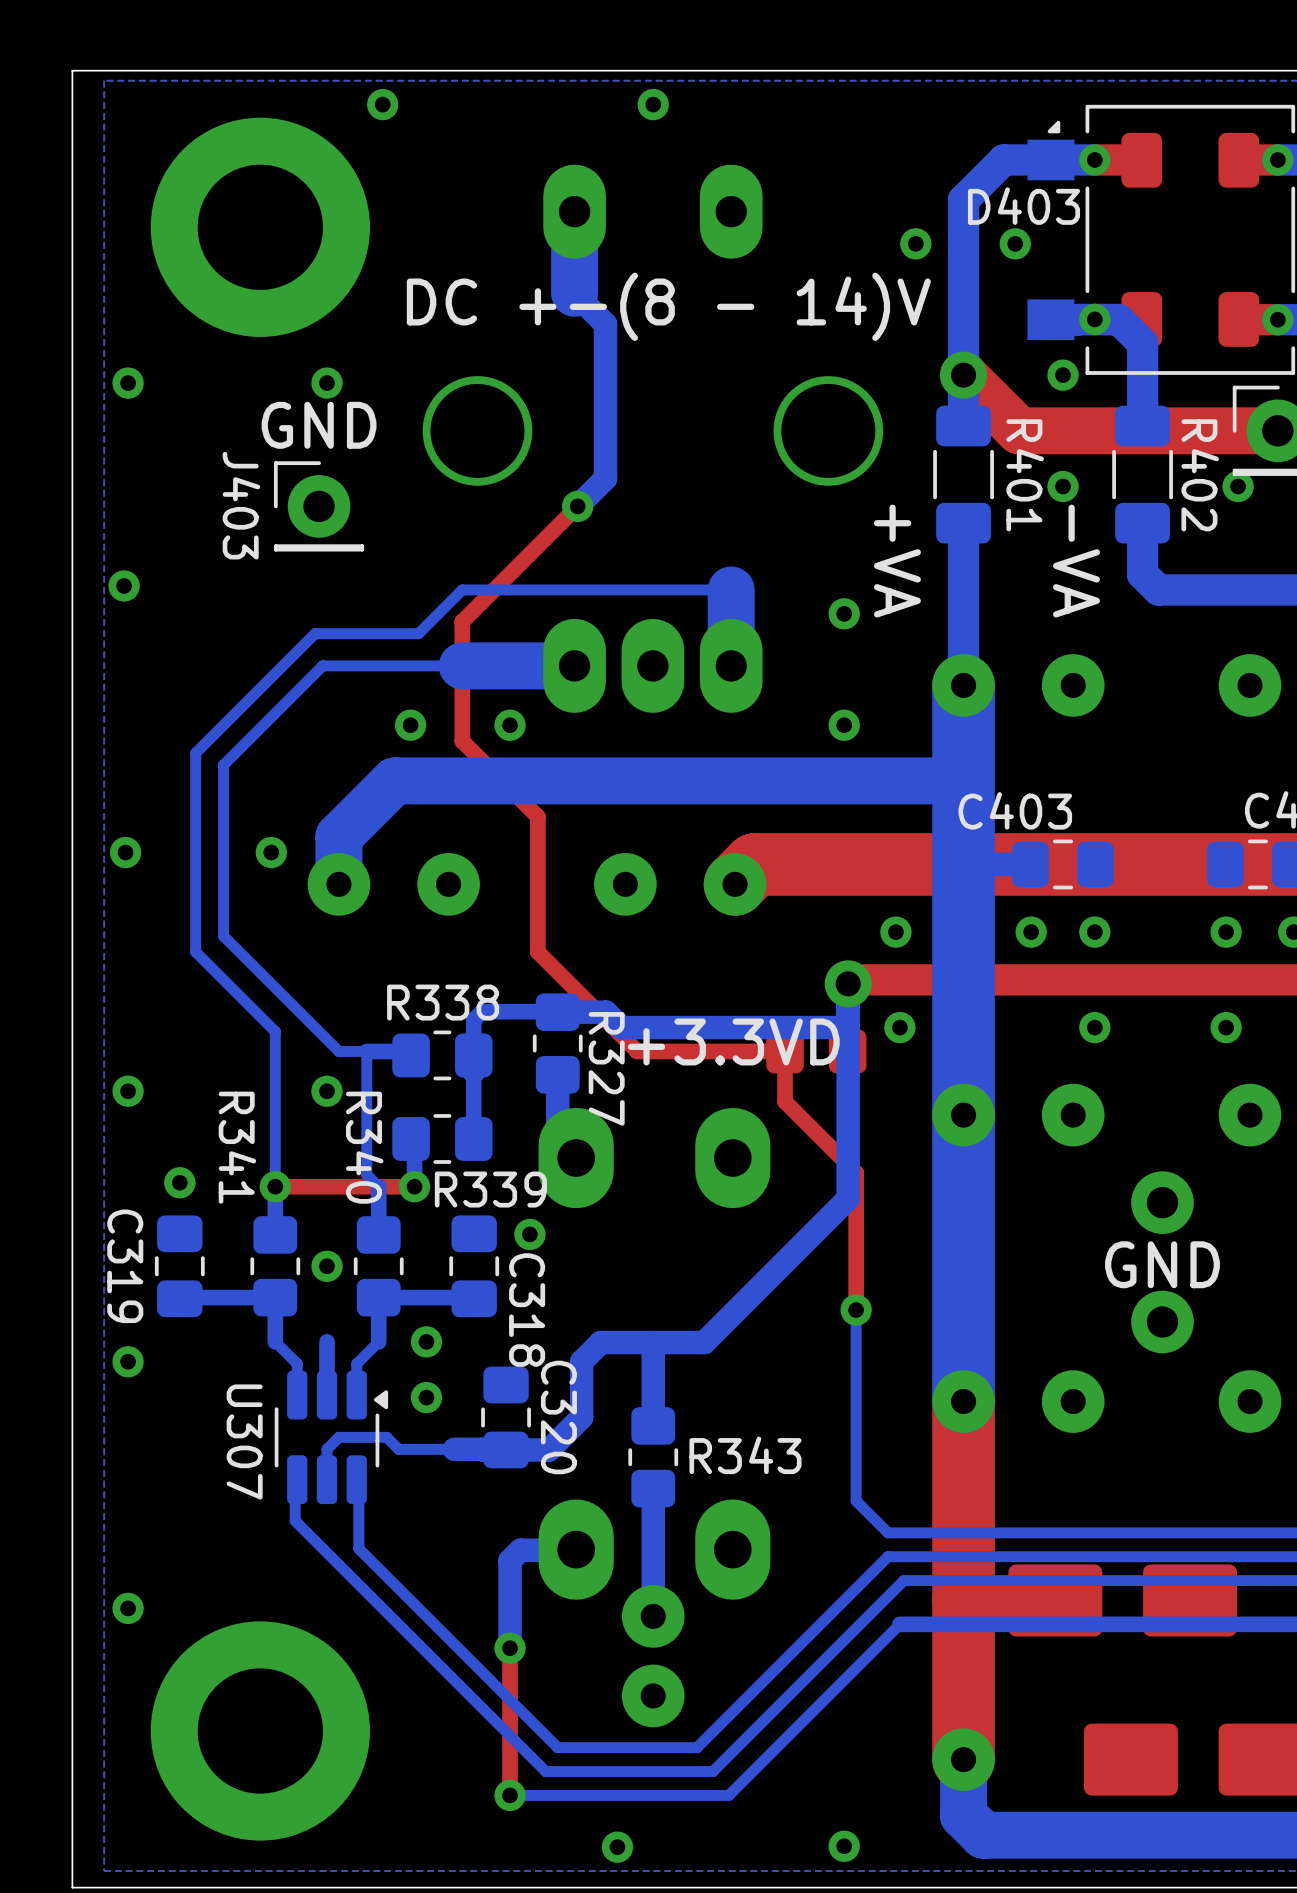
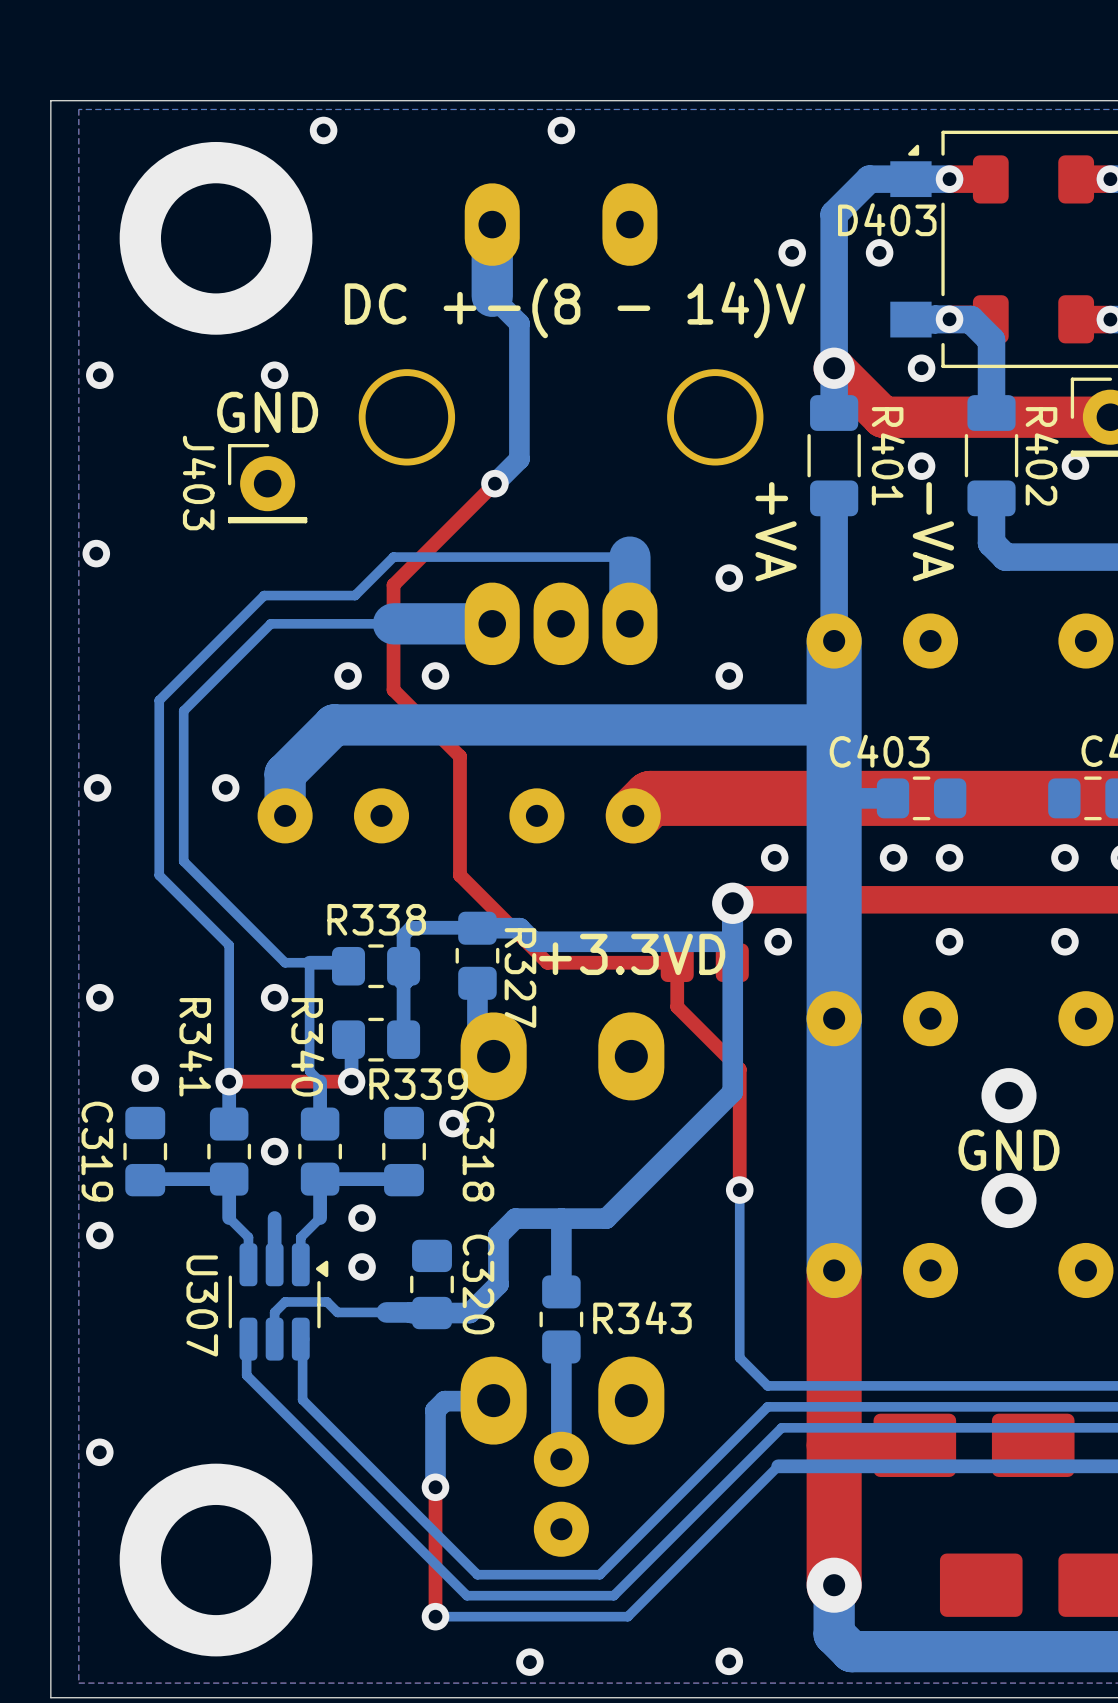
C318 name position: C318 (527, 1310) -> C318 (478, 1151)

